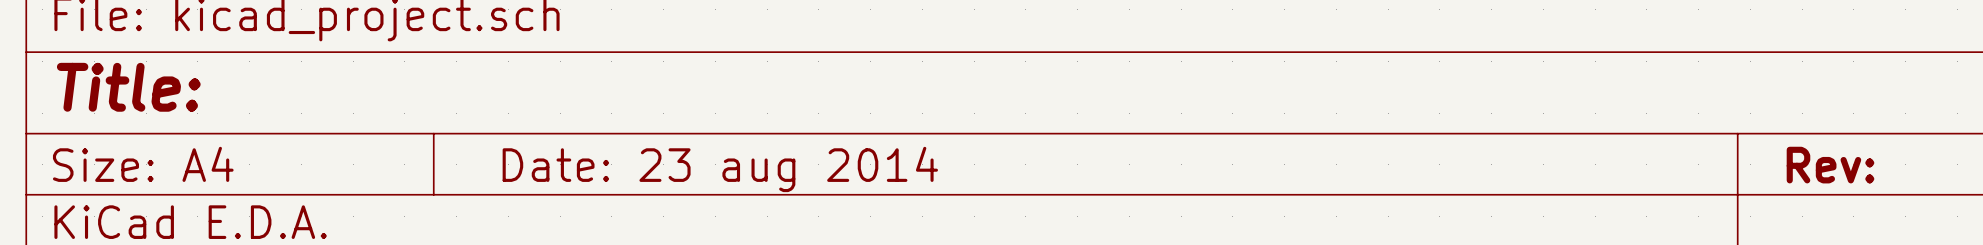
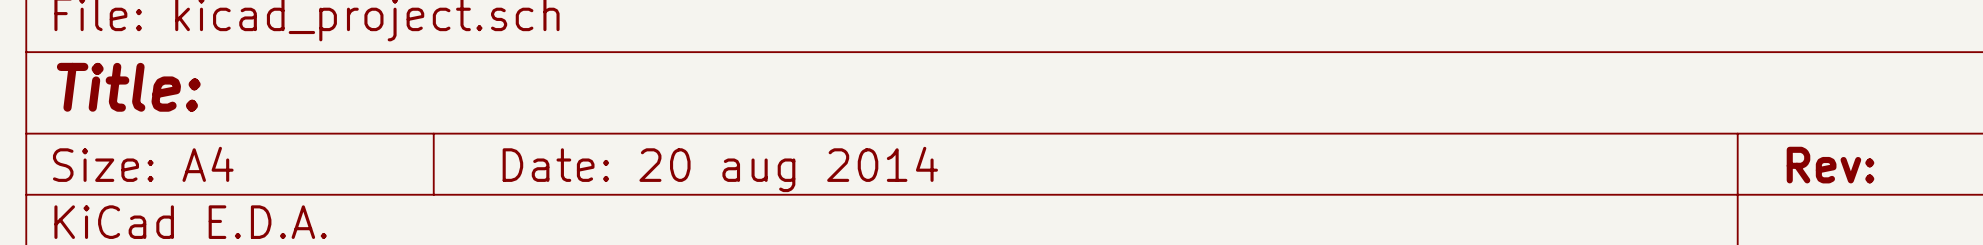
title block: Date: 23 aug 2014 (720, 169) -> Date: 20 aug 2014 (720, 169)

